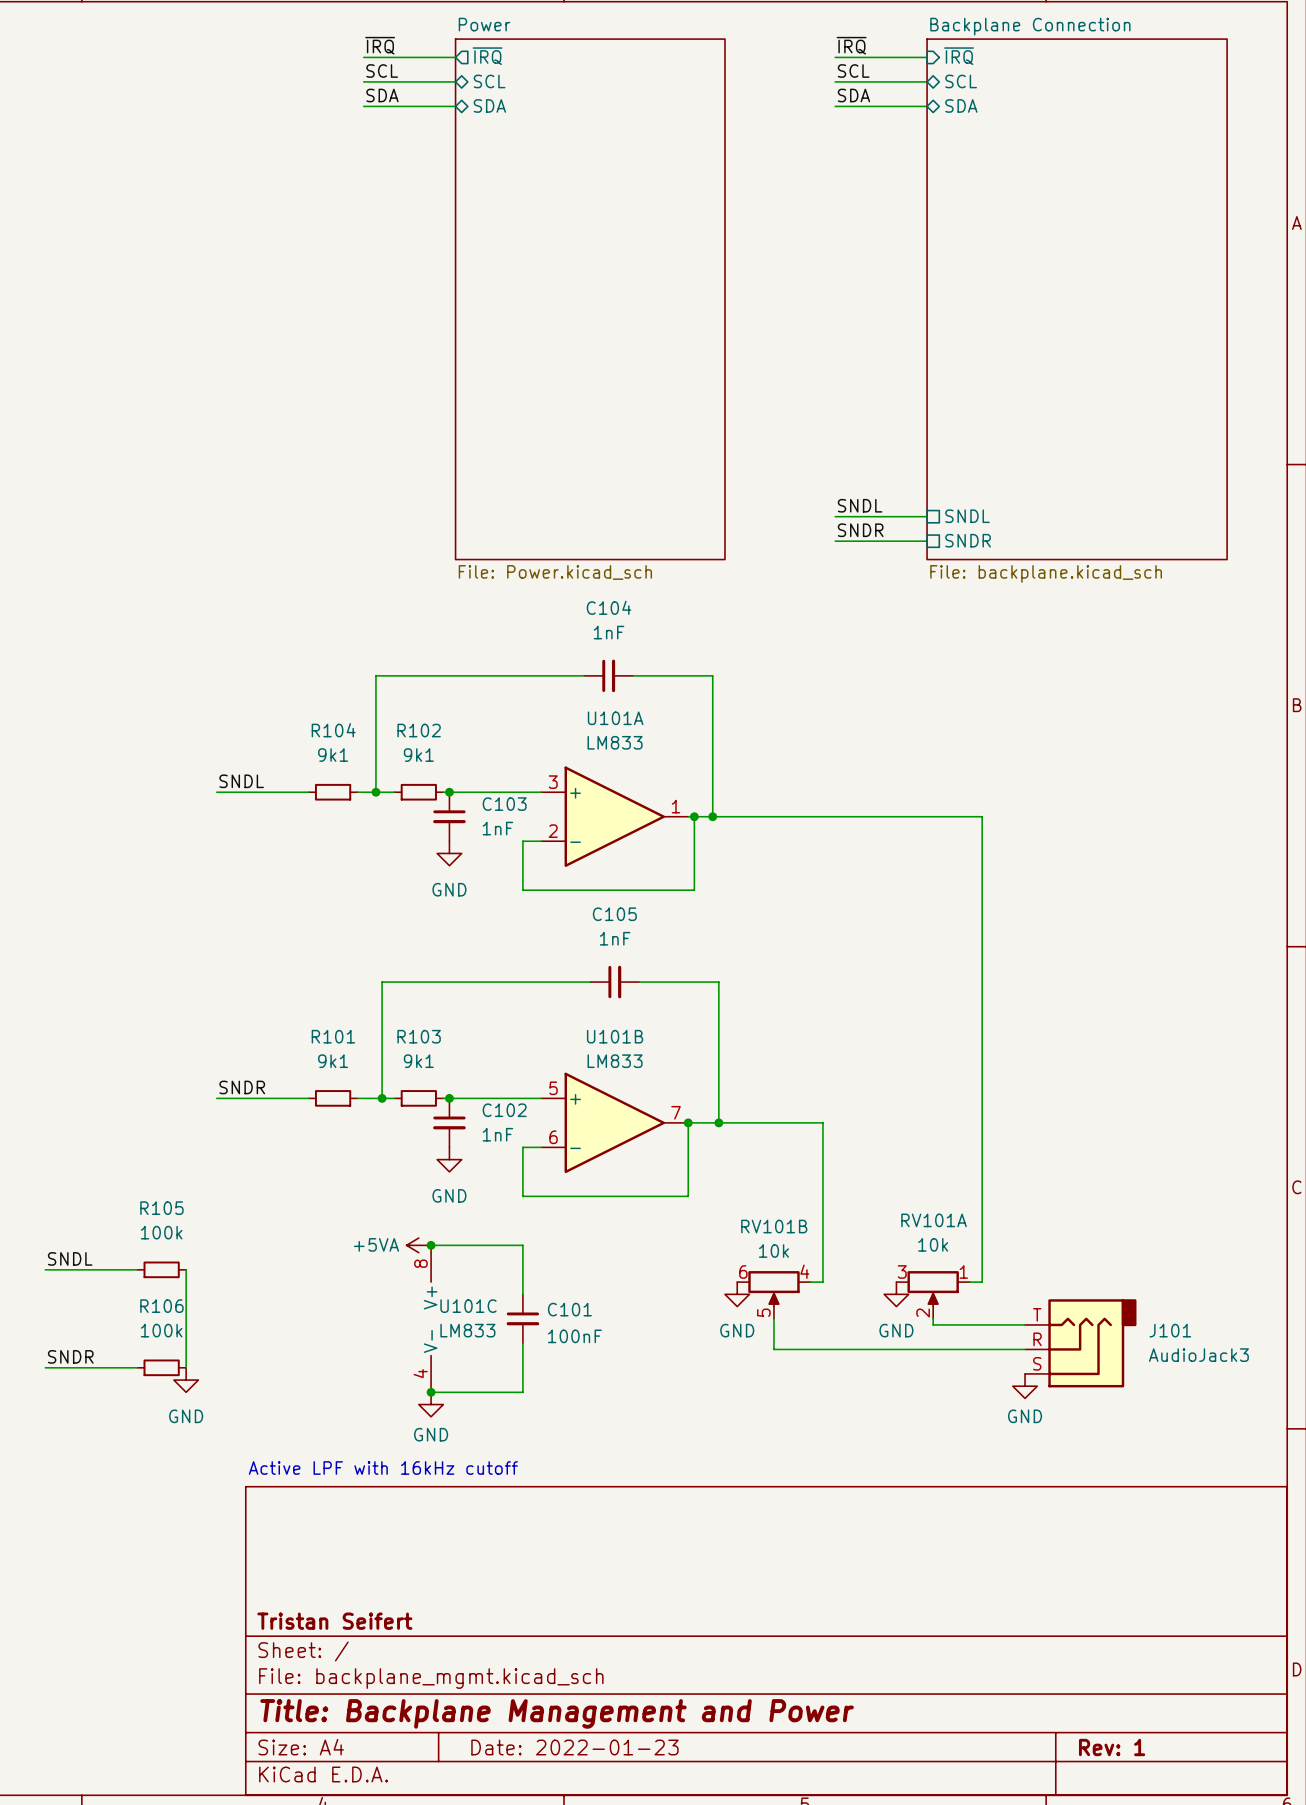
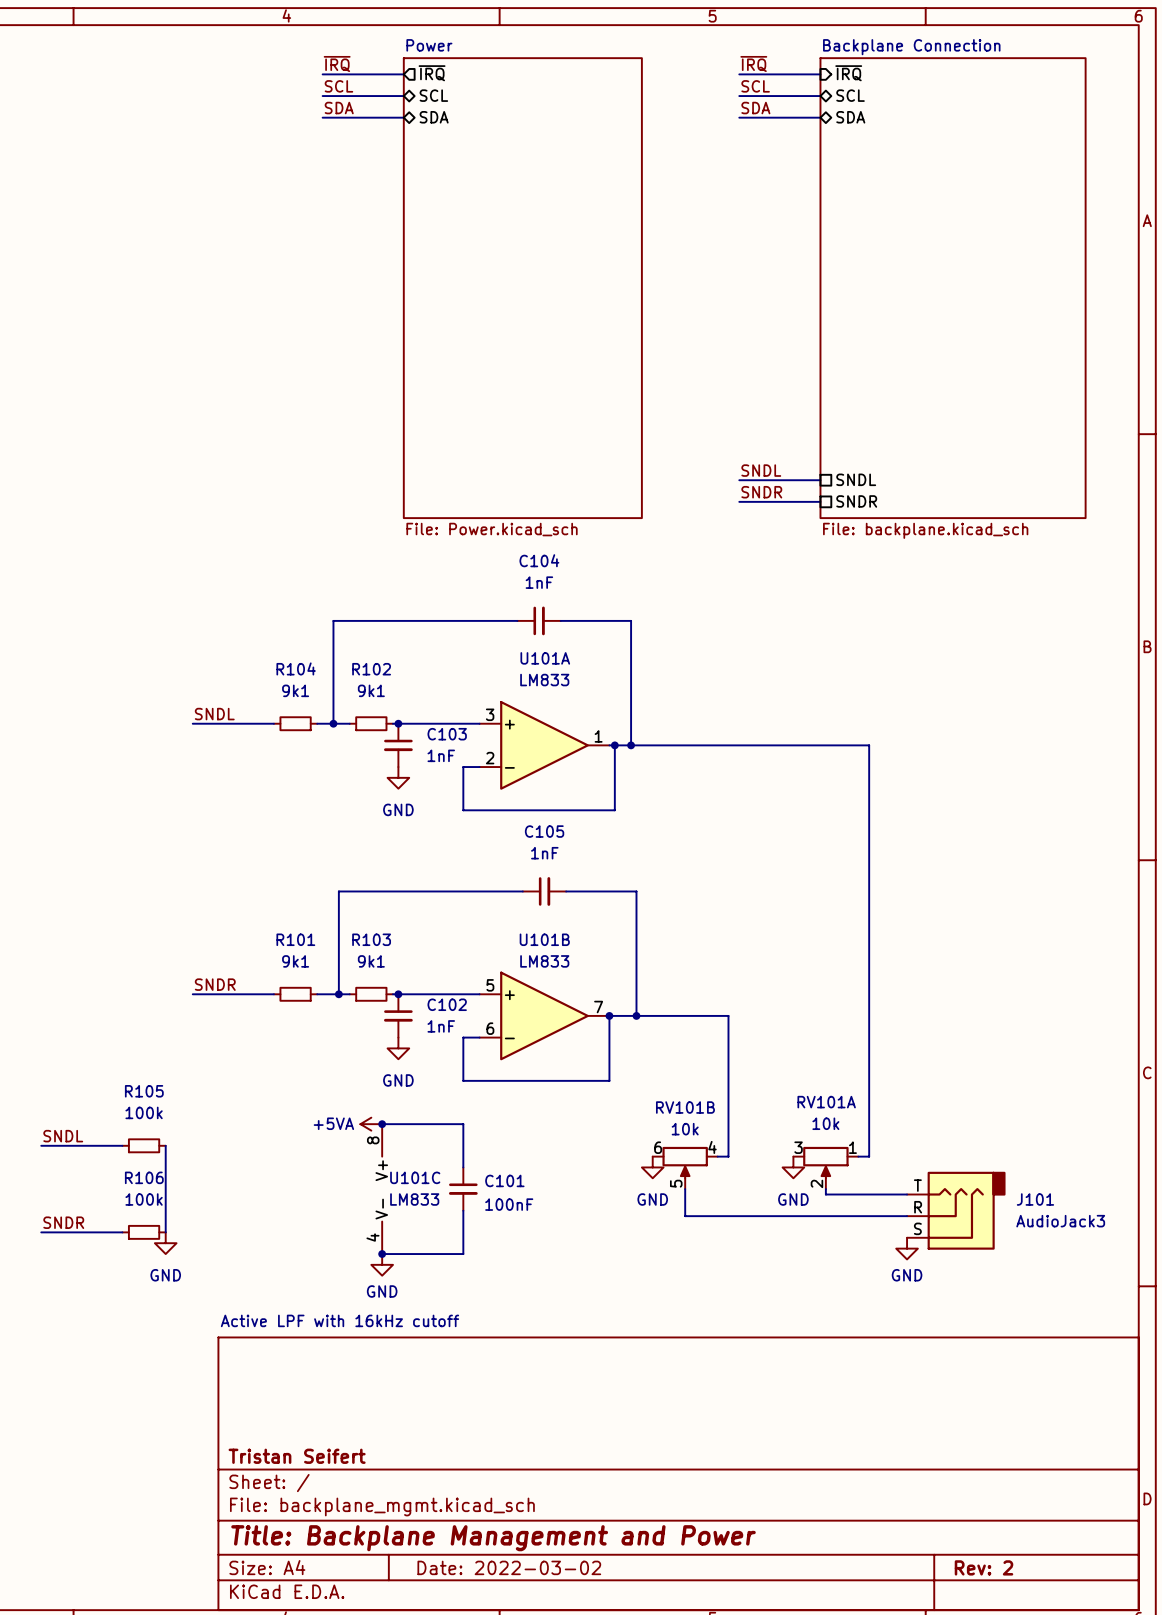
title block: Date: 2022-01-23 (574, 1747) -> Date: 2022-03-02 (509, 1567)
title block: Rev: 1 (1112, 1747) -> Rev: 2 (984, 1567)

